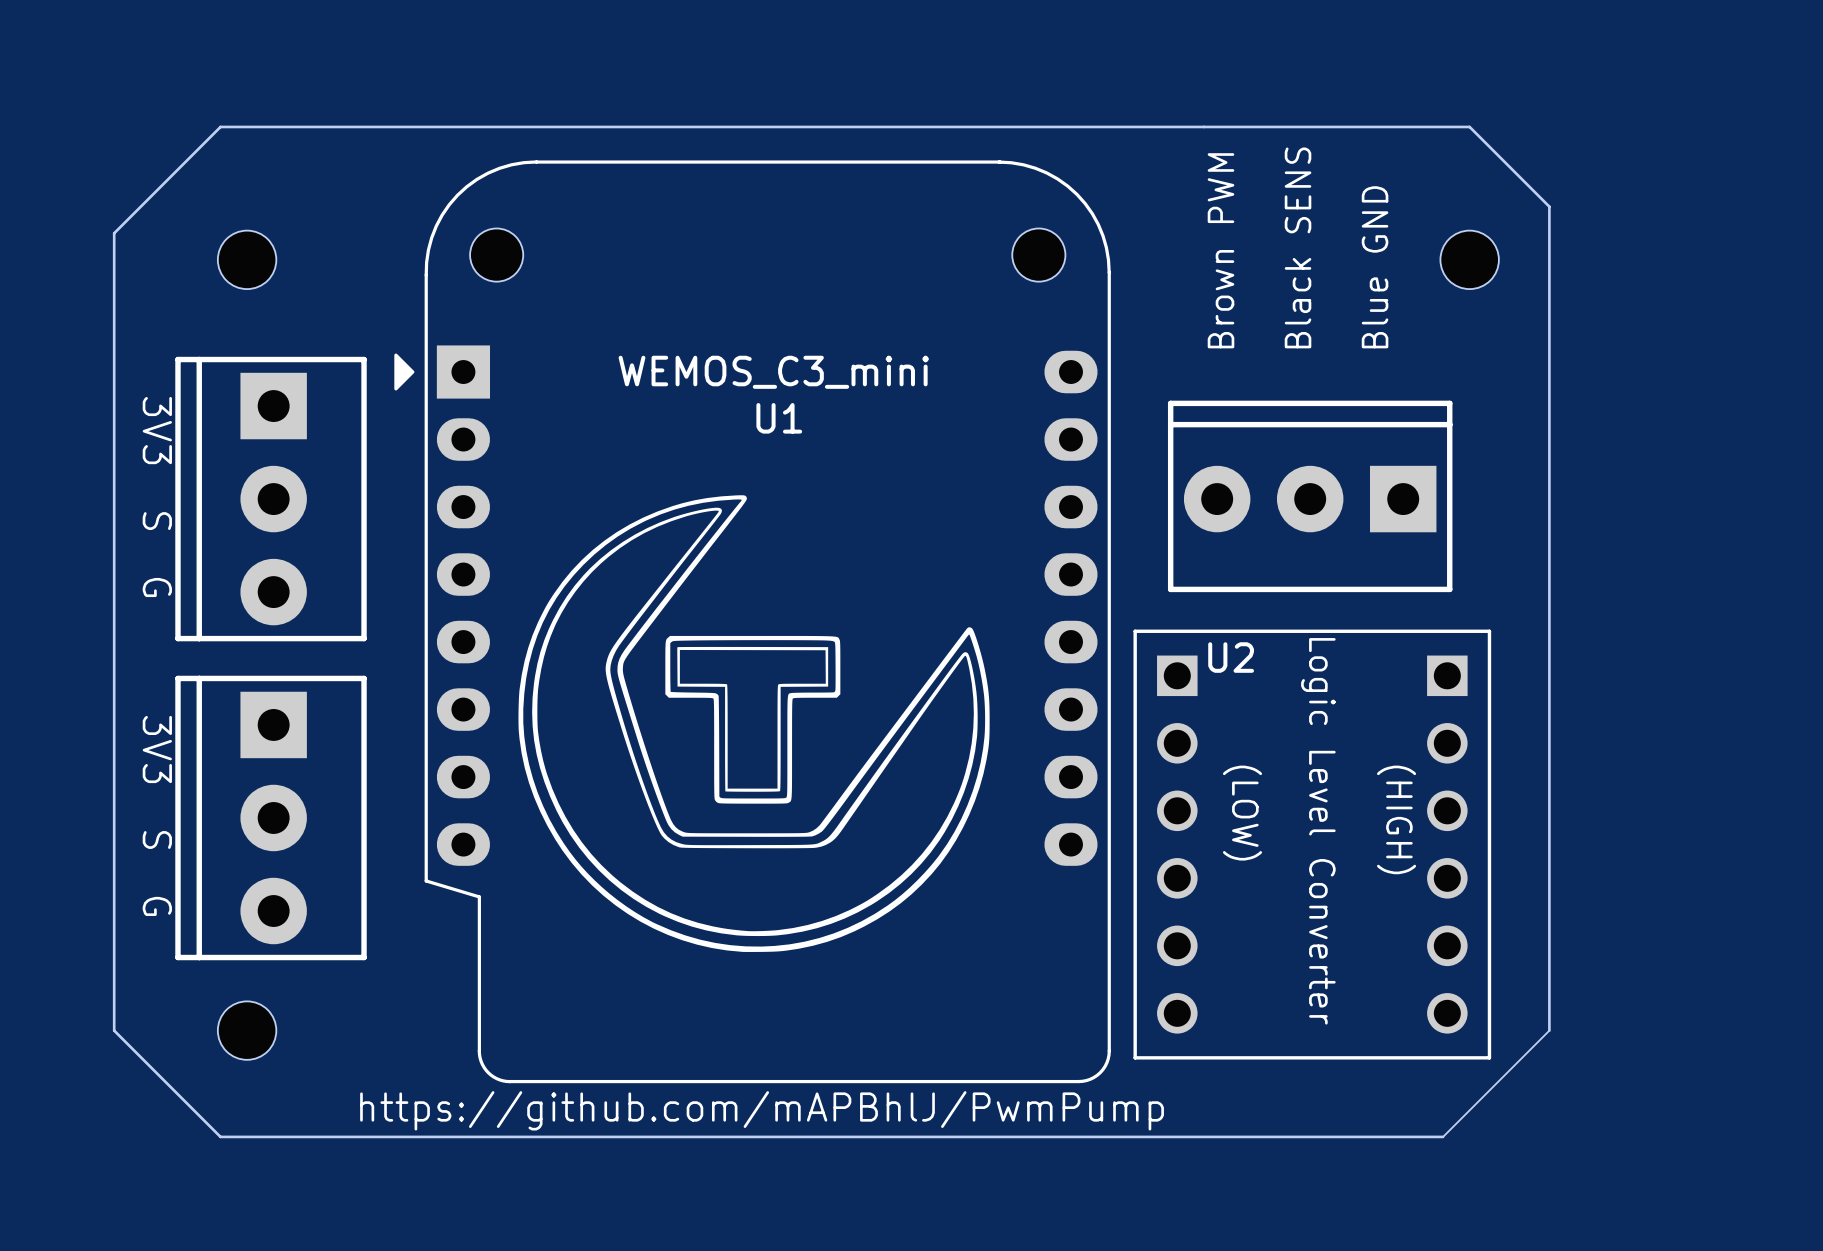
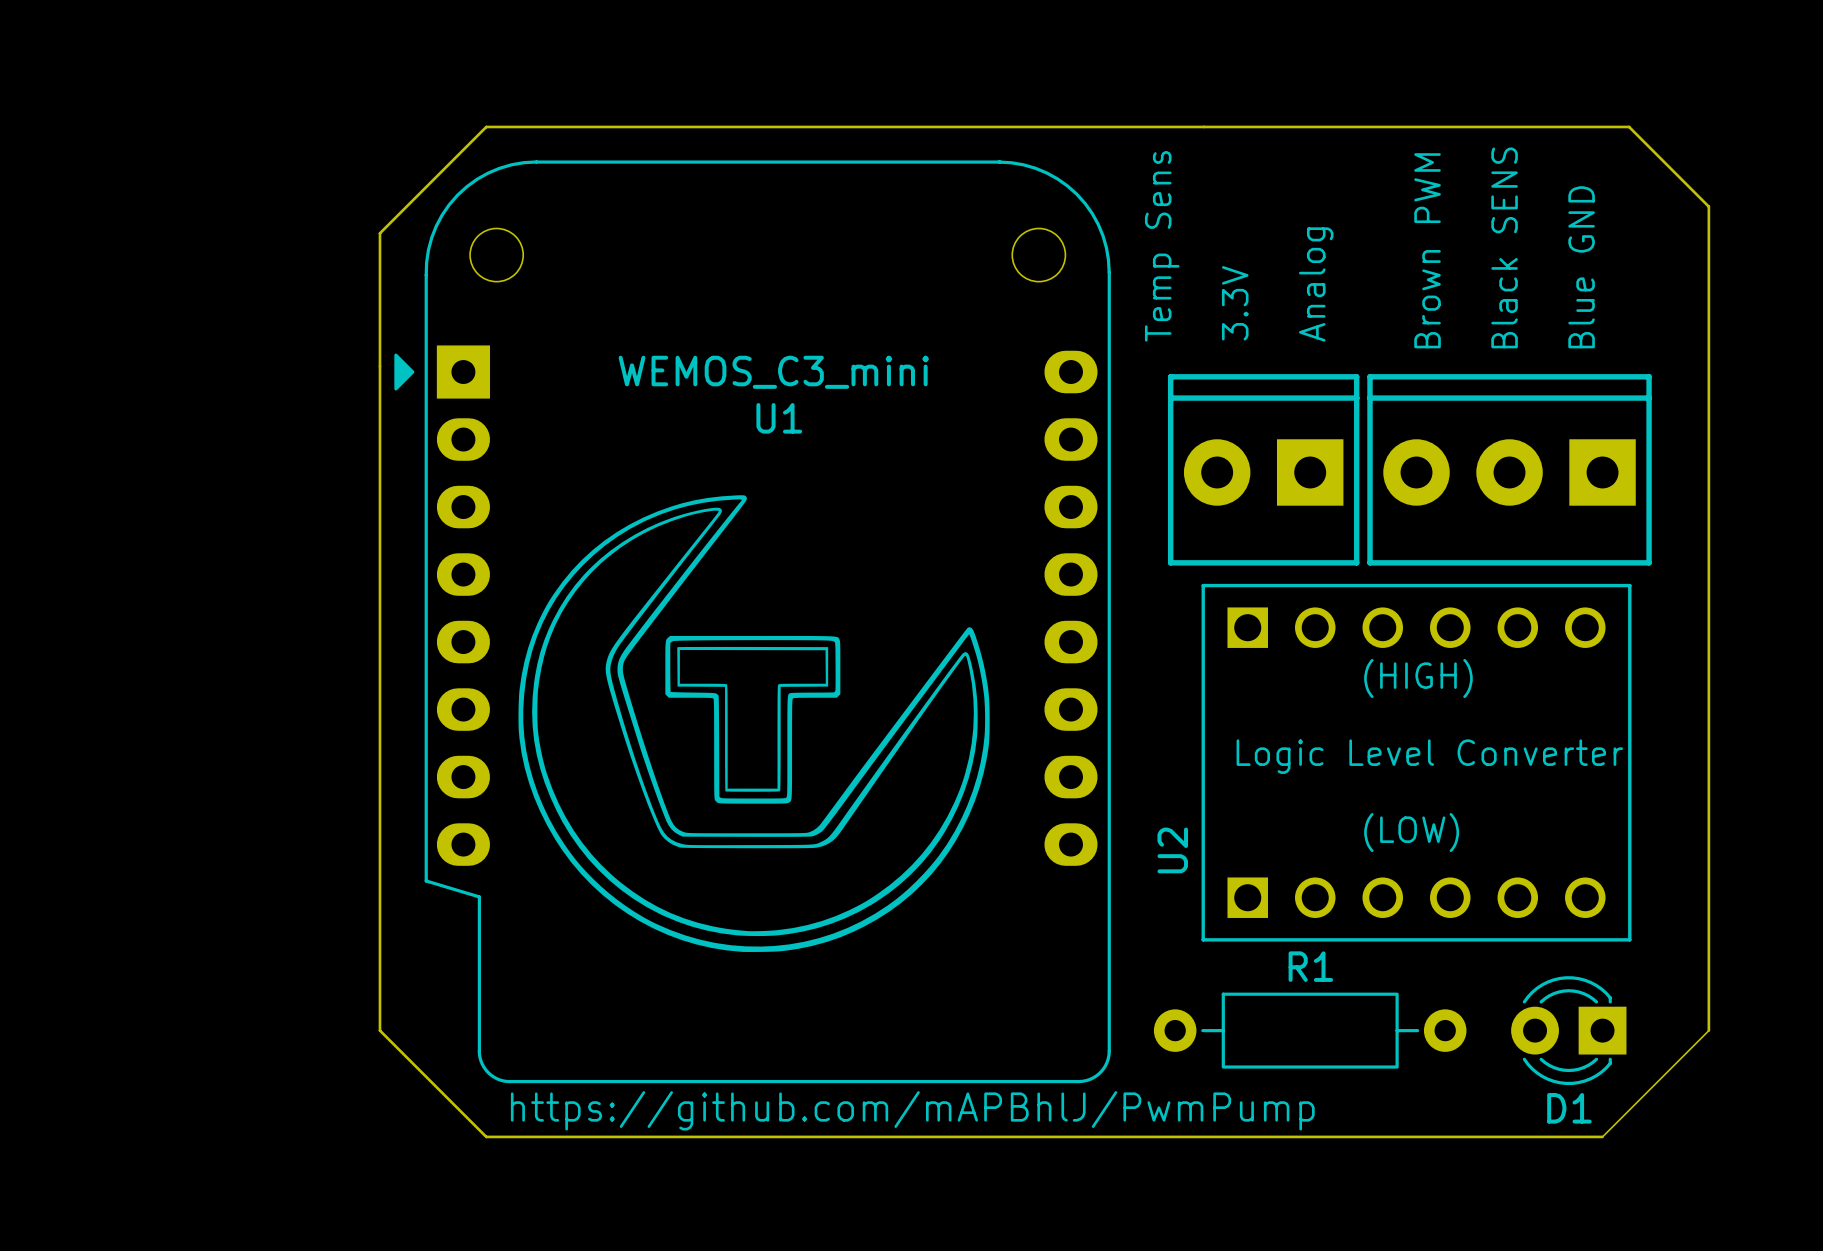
board edge: (486, 126) (220, 126) (114, 233) (114, 1030) (220, 1136) (486, 1136) -> (486, 126) (379, 233) (379, 1030) (486, 1136)
board edge: (1469, 126) (1549, 206) (1549, 1030) (1443, 1136) -> (1469, 126) (1629, 126) (1708, 206) (1708, 1030) (1602, 1136) (1443, 1136)
text: none -> Temp Sens (1162, 246)
text position: Black SENS (1298, 247) -> Black SENS (1504, 247)
text position: Brown PWM (1221, 250) -> Brown PWM (1427, 250)
part: (247, 259) -> none
part: (1469, 259) -> none
text position: Blue GND (1375, 267) -> Blue GND (1581, 267)
text: none -> Analog (1316, 284)
text: none -> 3.3V (1235, 303)
part: none -> (1263, 469)
part position: (1310, 496) -> (1509, 469)
text: 3V3 S G (157, 497) -> none
part: (271, 499) -> none
U2 name position: U2 (1231, 657) -> U2 (1172, 850)
text rotation: 0° (1242, 813) -> 90° counterclockwise (1411, 832)
text: 3V3 S G (157, 815) -> none
part: (271, 817) -> none
text rotation: 0° (1396, 819) -> 90° counterclockwise (1418, 678)
text rotation: 0° (1318, 831) -> 90° counterclockwise (1429, 756)
U2 rotation: 0° (1312, 844) -> 90° counterclockwise (1416, 762)
part: (247, 1030) -> none
R1: none -> (1310, 1030)
D1: none -> (1568, 1030)
text position: https://github.com/mAPBhlJ/PwmPump (762, 1110) -> https://github.com/mAPBhlJ/PwmPump (912, 1110)

